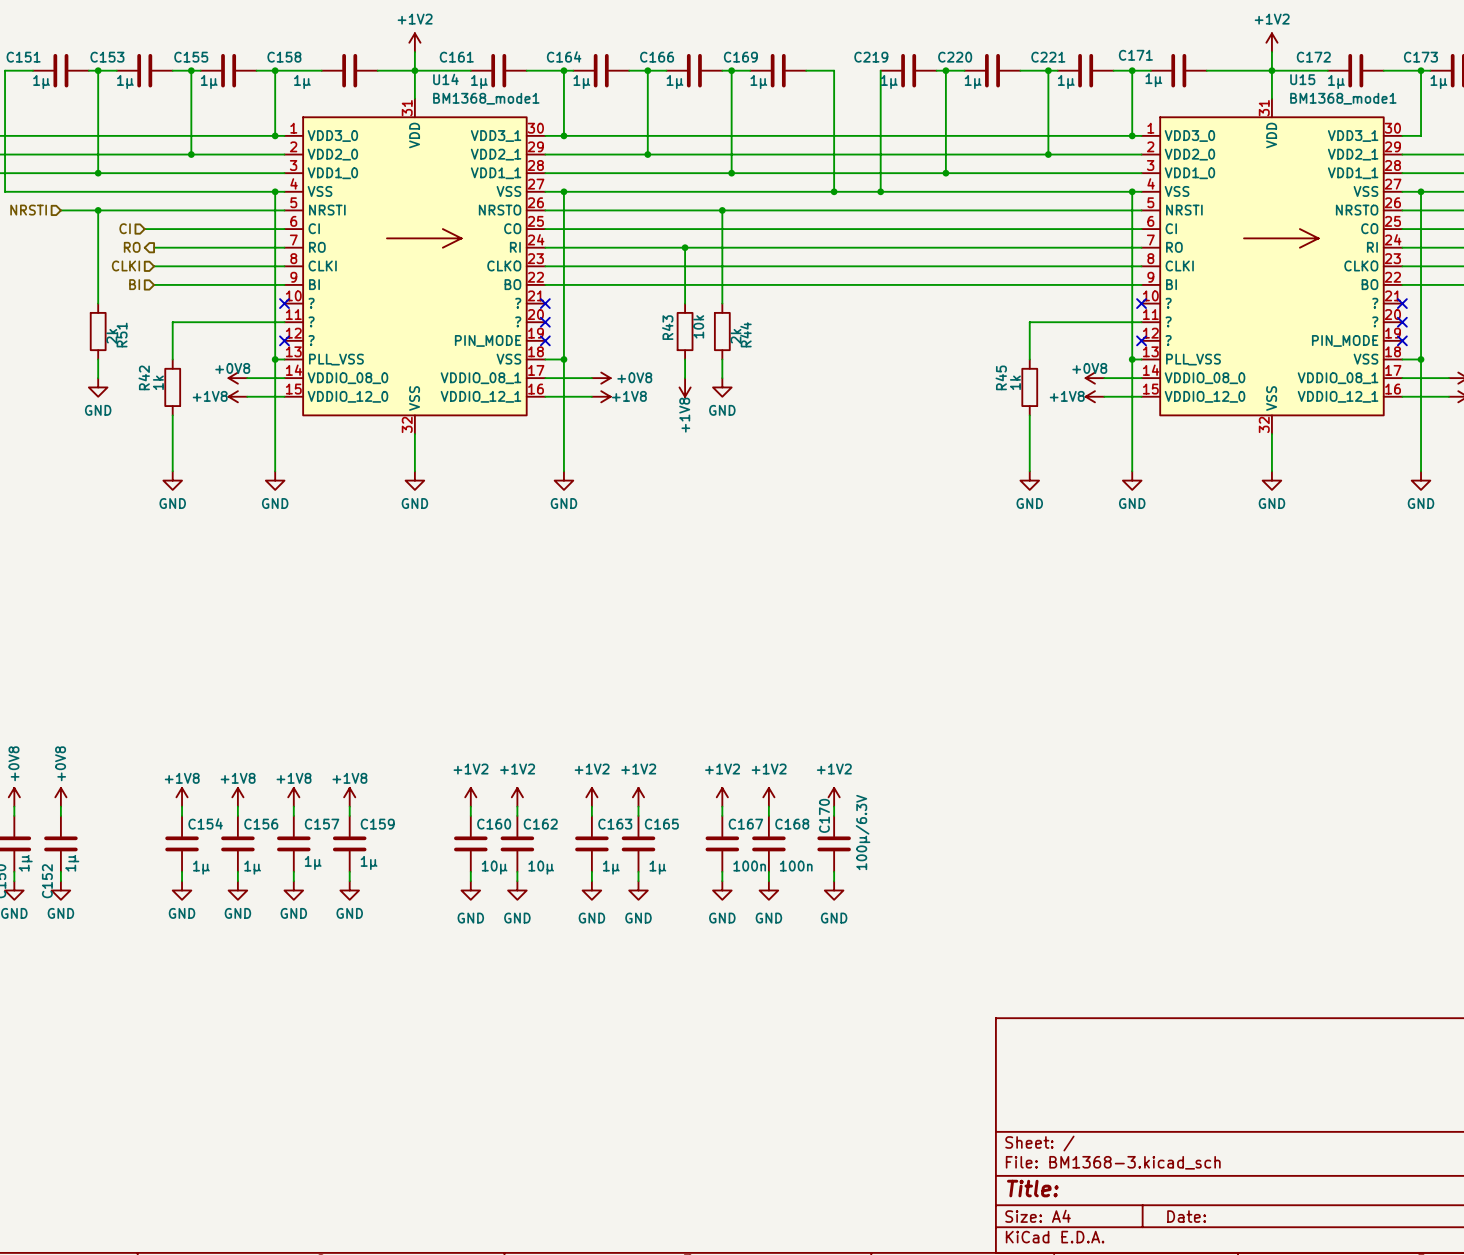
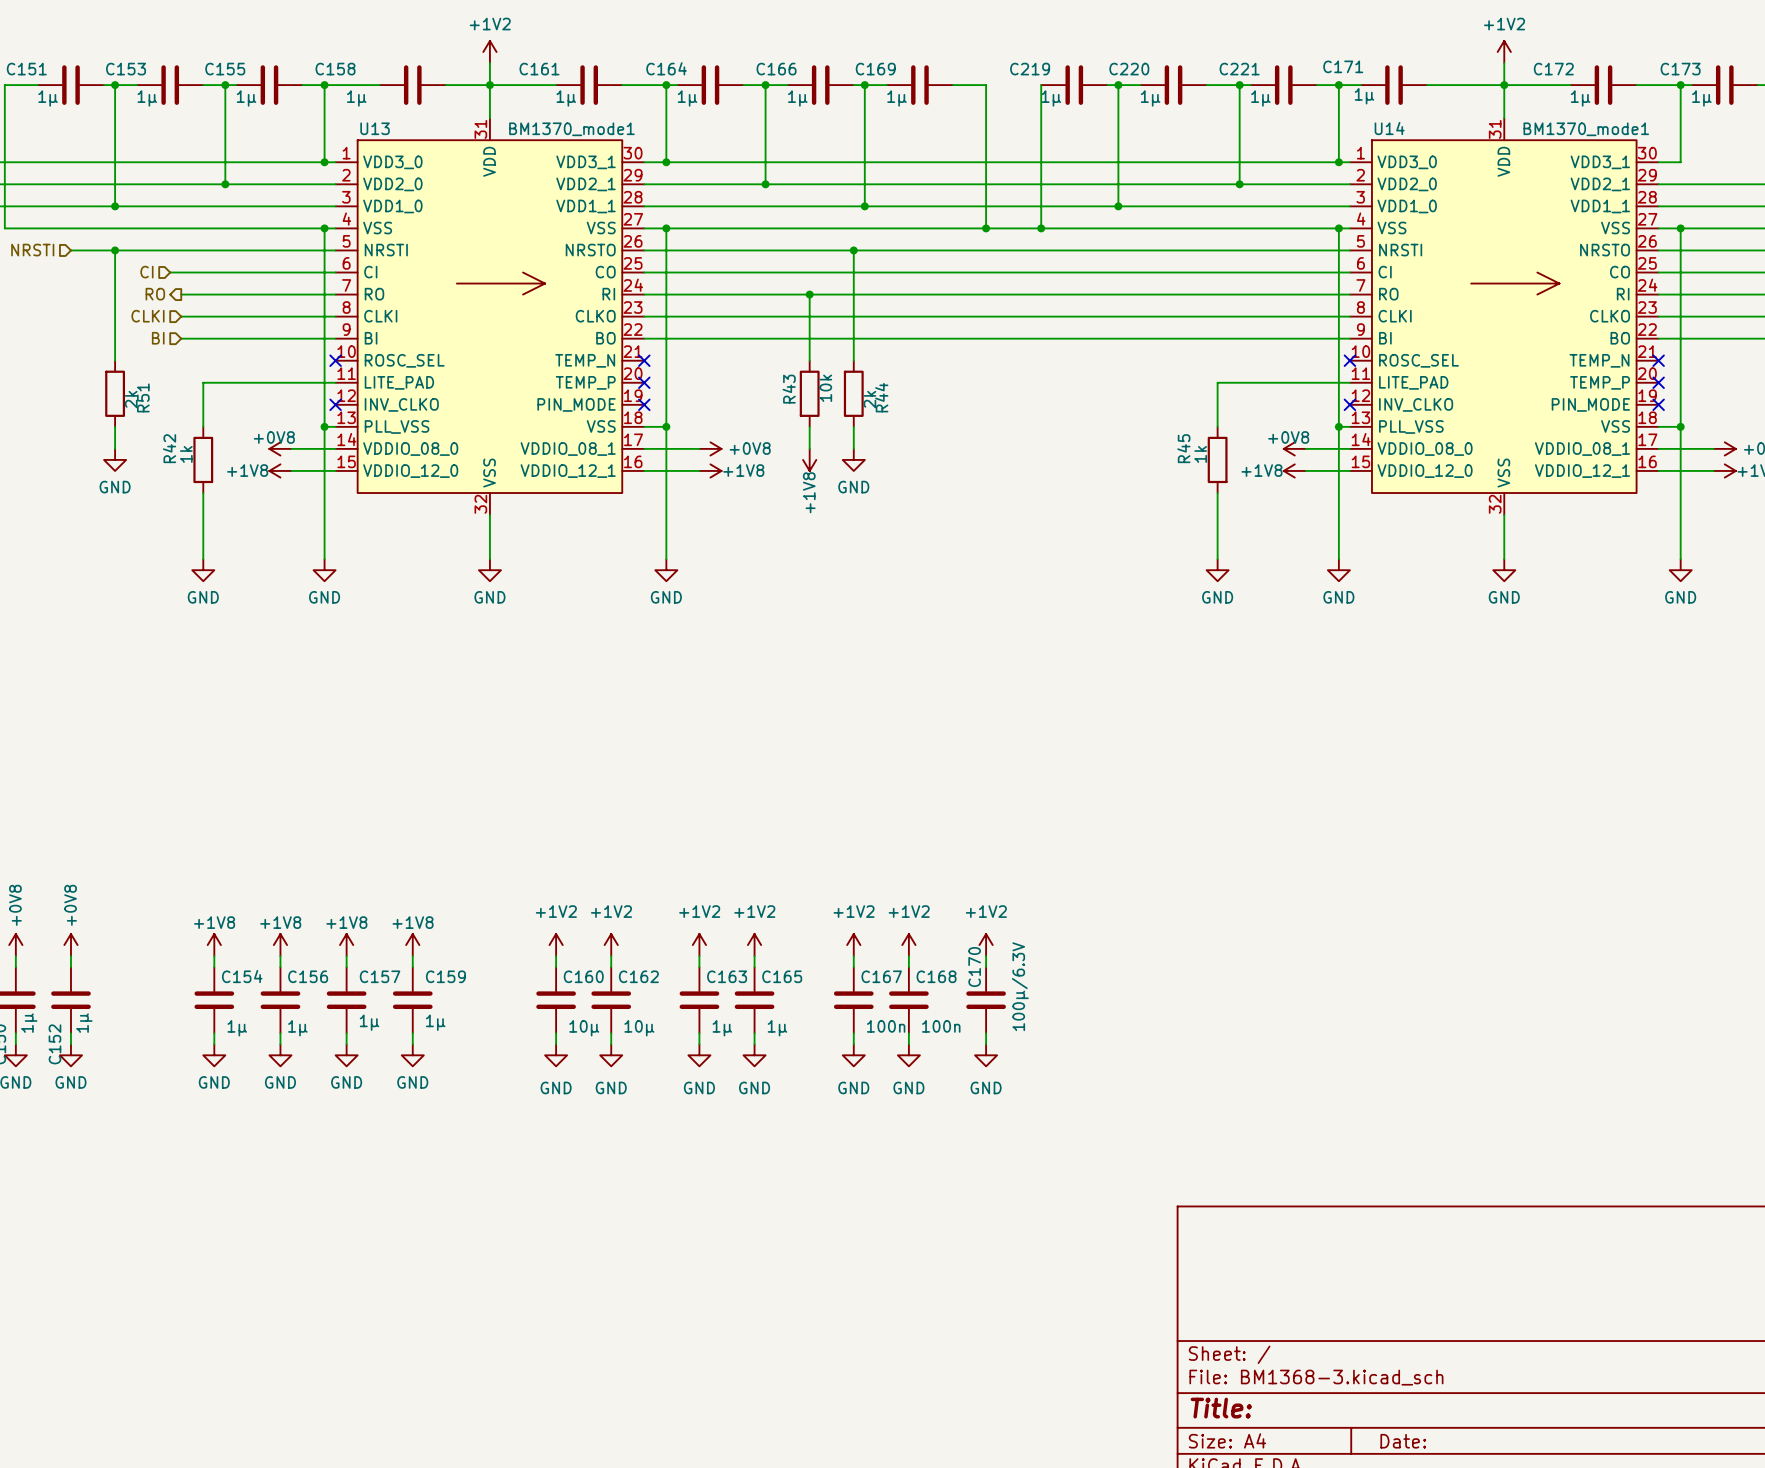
U14 name position: U14 (445, 79) -> U14 (1389, 128)
U14 value: BM1368_mode1 (486, 98) -> BM1370_mode1 (1586, 129)
U14 position: (414, 266) -> (1504, 316)
U13: none -> BM1370_mode1 (489, 316)
U15: BM1368_mode1 (1271, 266) -> none
U14 pin name: ? (311, 303) -> ROSC_SEL (1418, 360)
U14 pin name: ? (518, 303) -> TEMP_N (1599, 360)
U14 pin name: ? (311, 321) -> LITE_PAD (1413, 382)
U14 pin name: ? (518, 321) -> TEMP_P (1600, 382)
U14 pin name: ? (311, 340) -> INV_CLKO (1416, 404)

